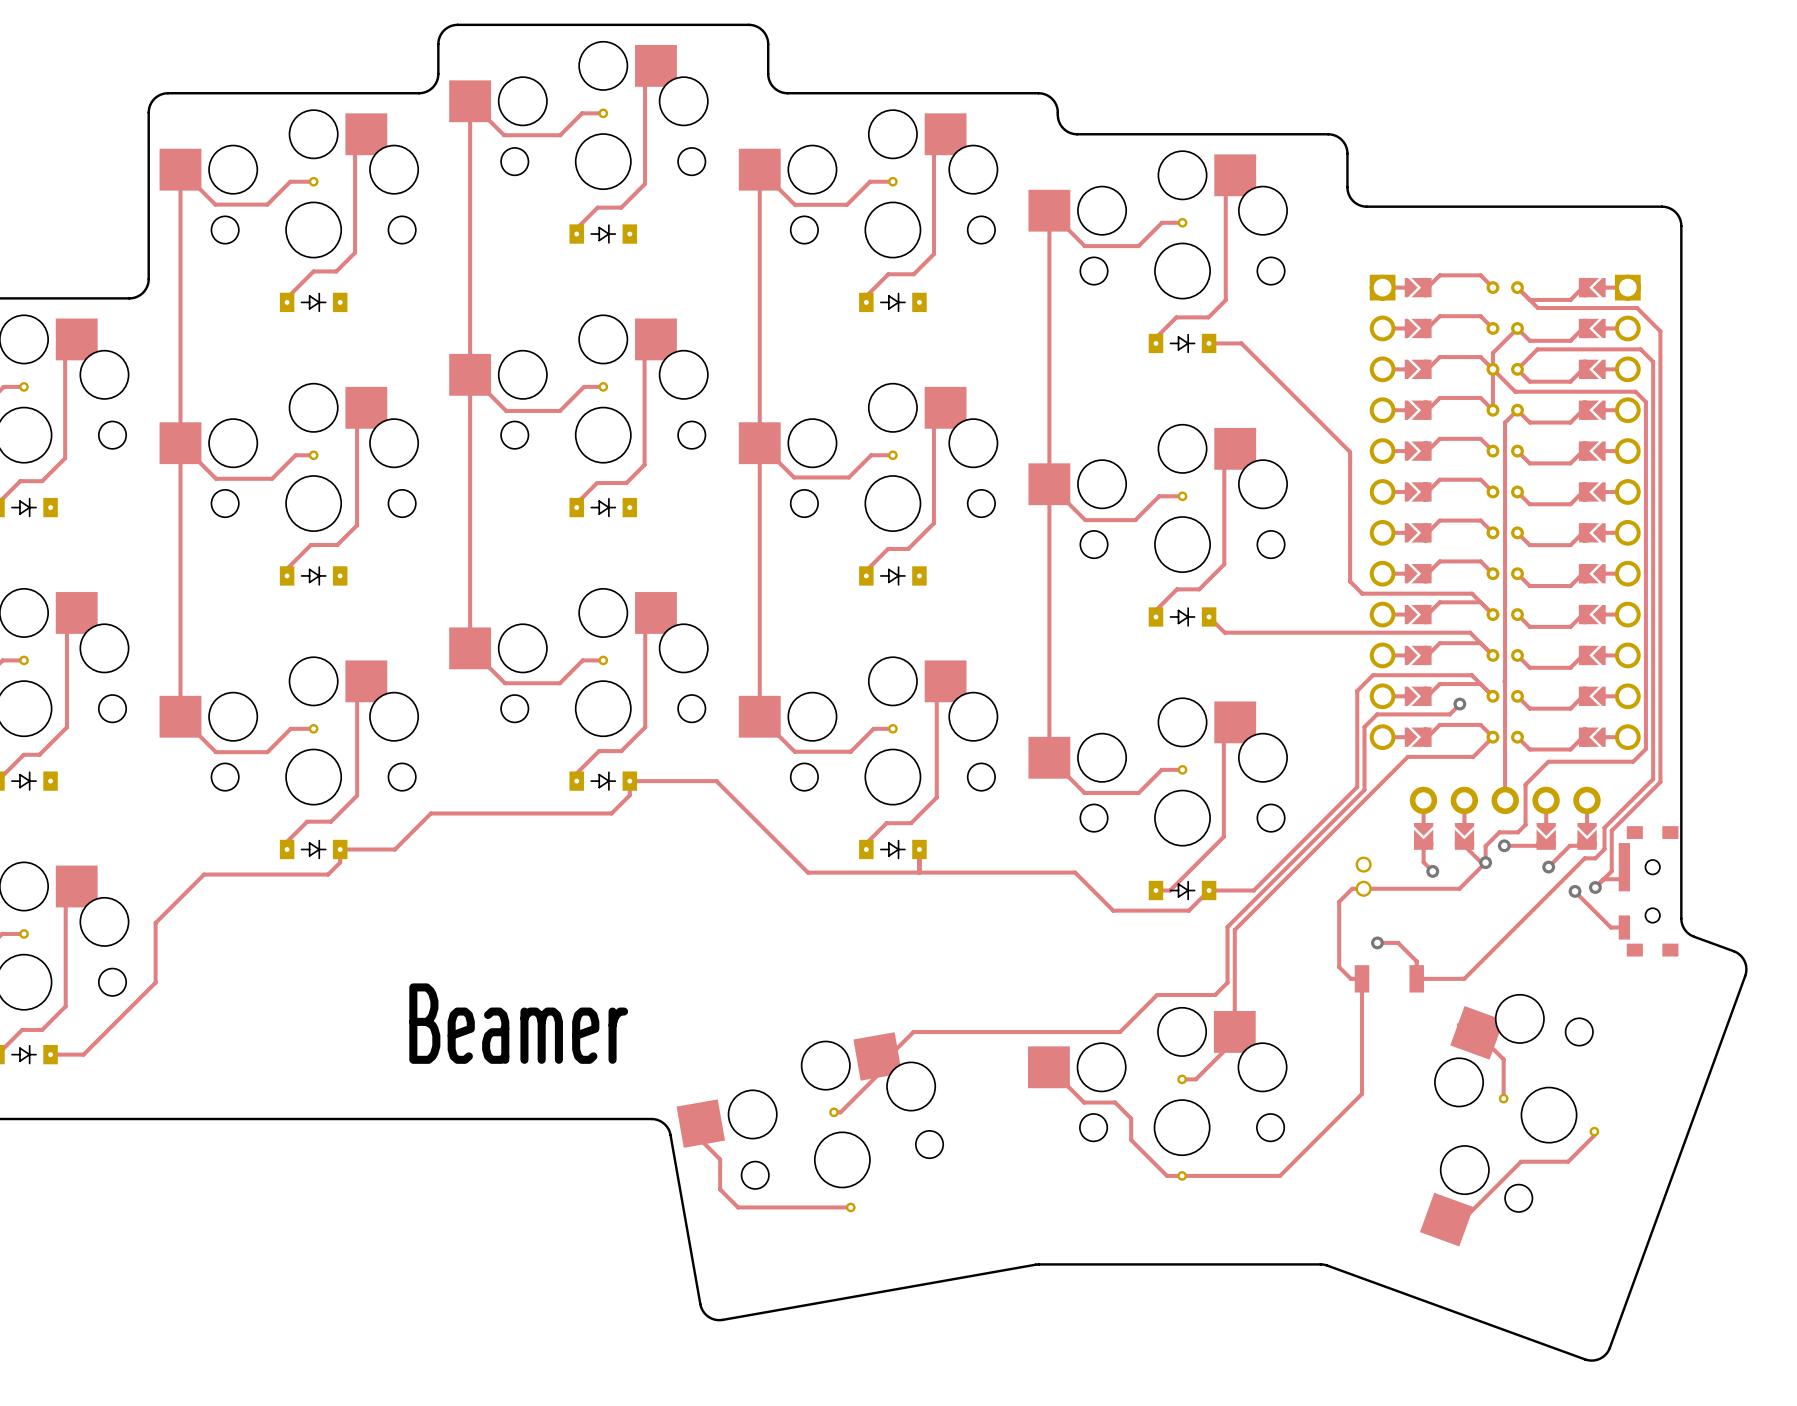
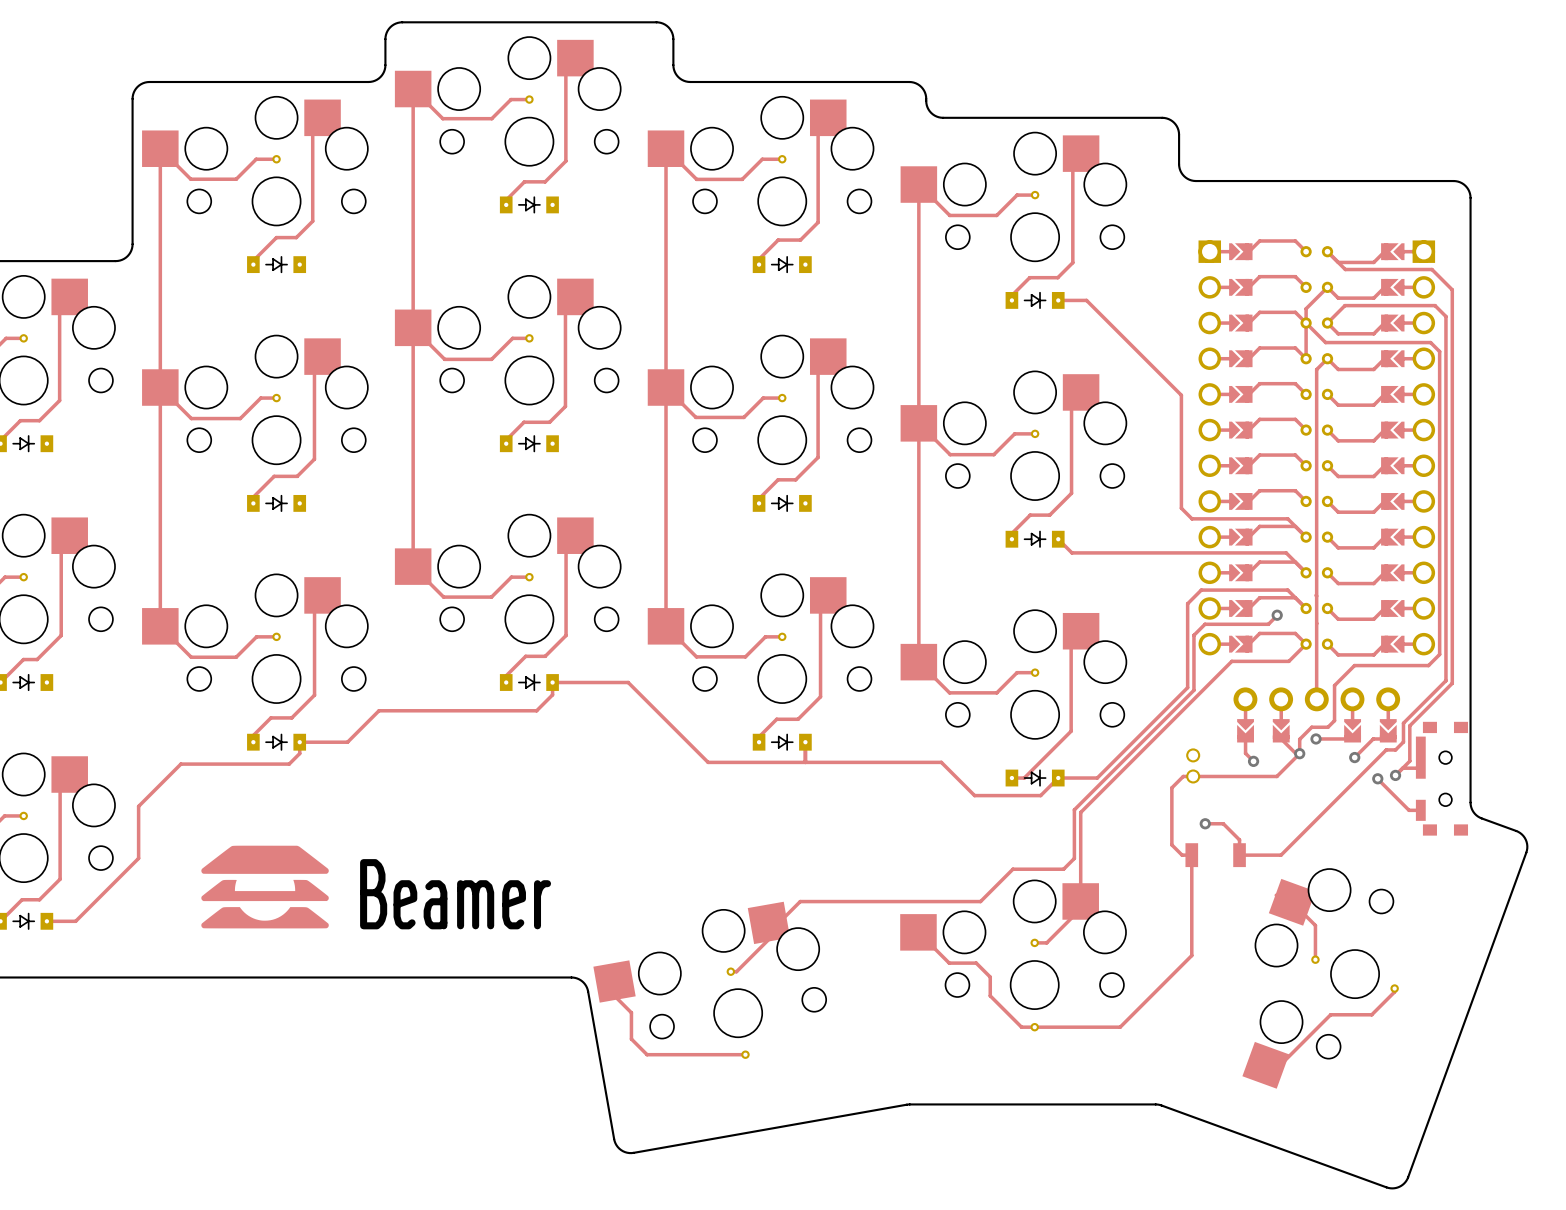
drawing: none -> [201, 845, 329, 929]

